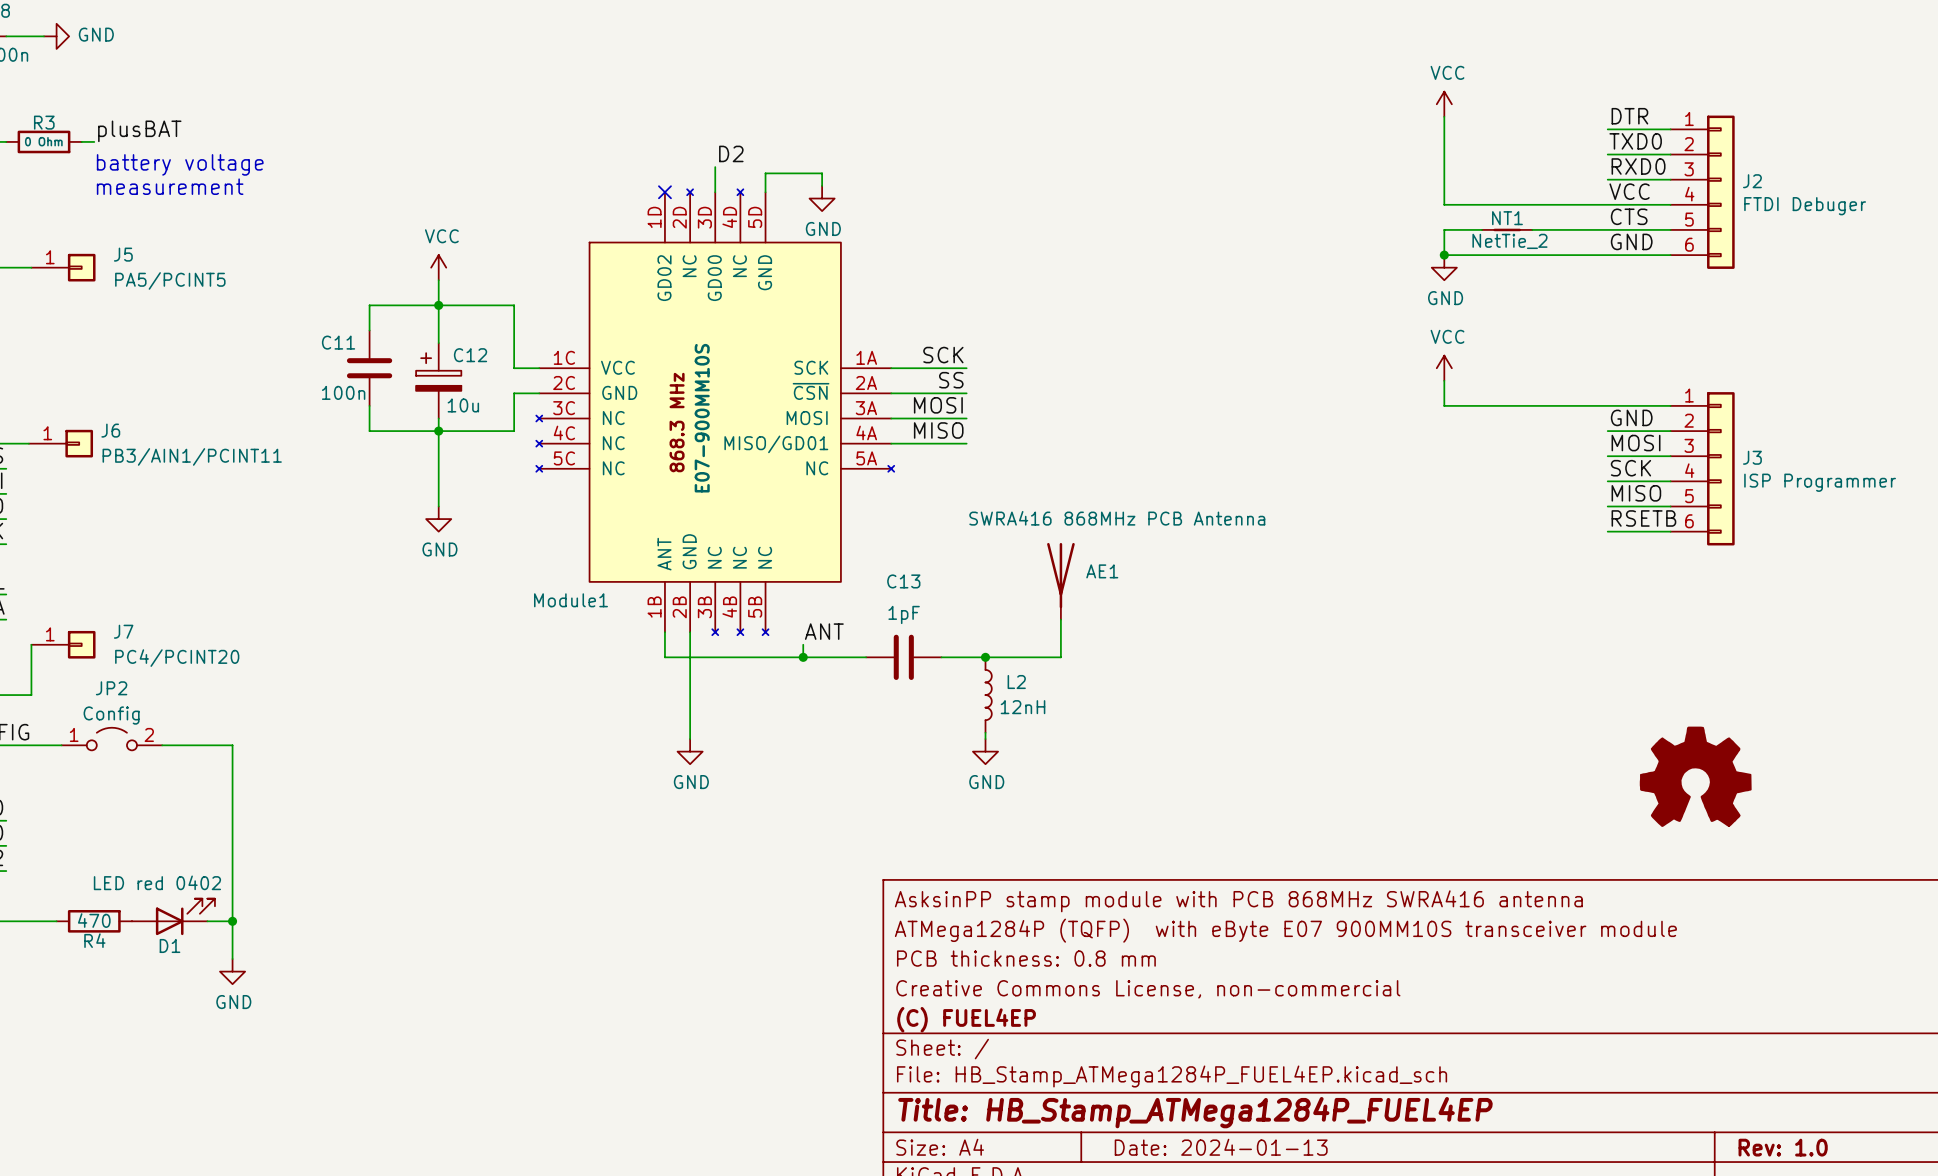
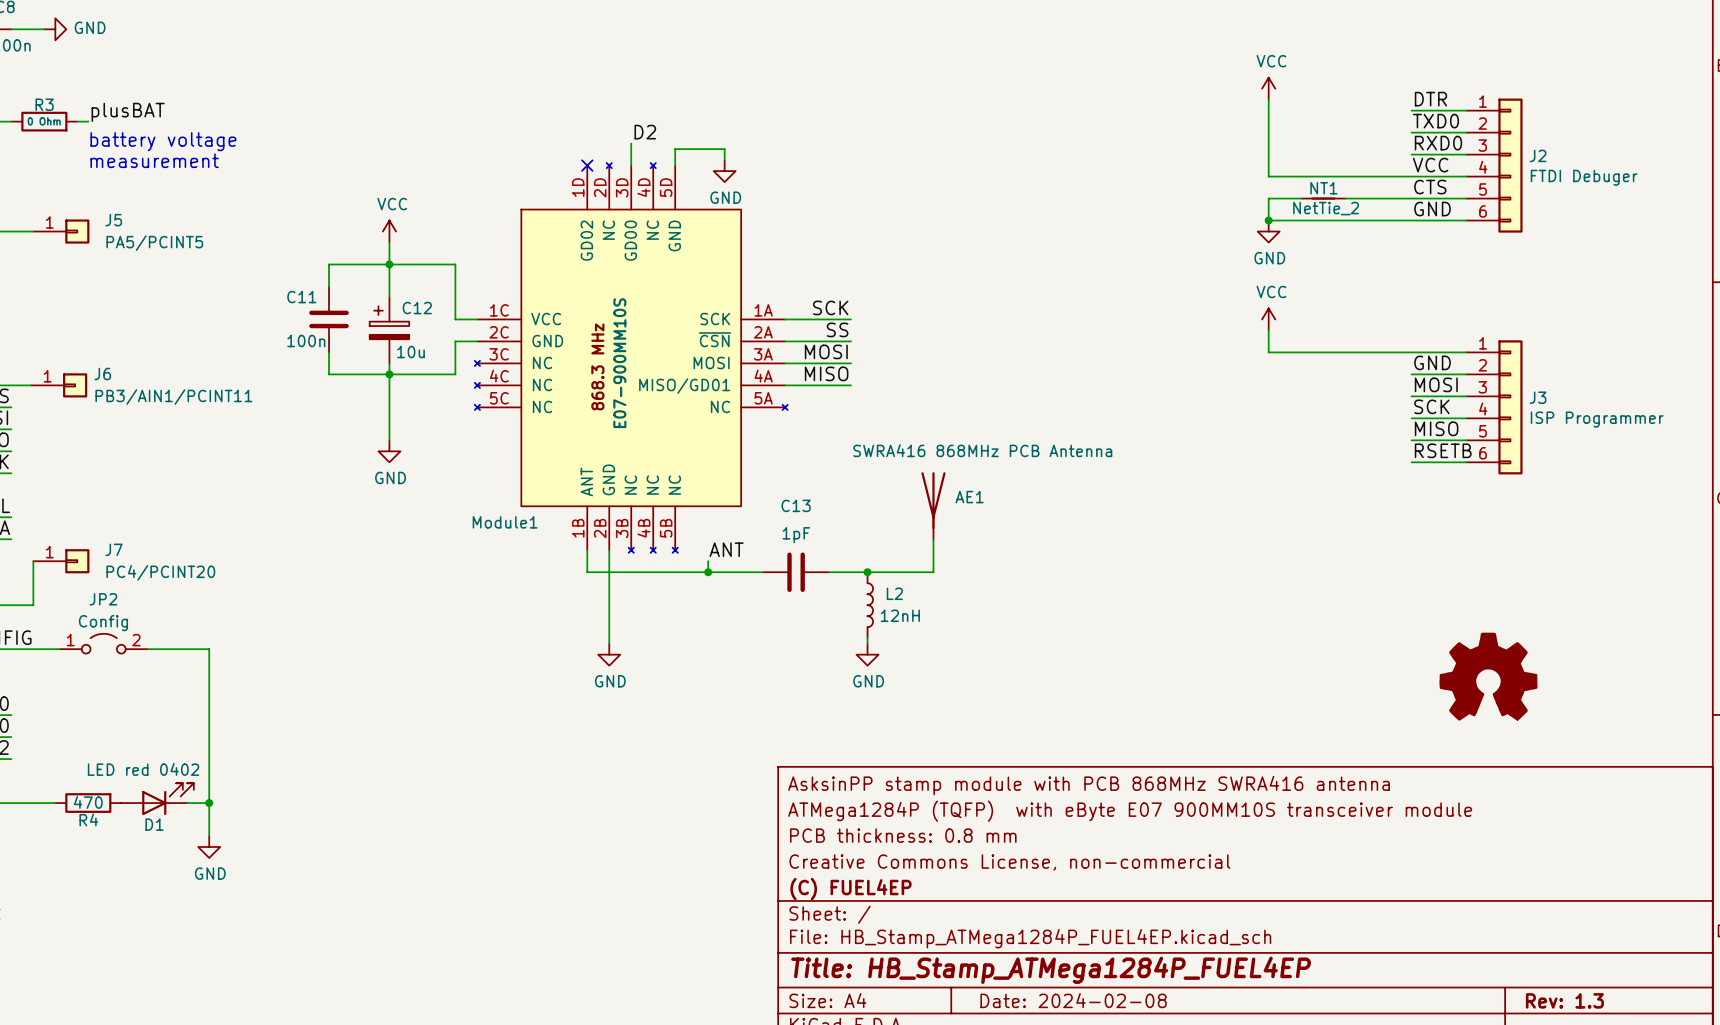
title block: Date: 2024-01-13 (1221, 1147) -> Date: 2024-02-08 (1073, 1000)
title block: Rev: 1.0 (1783, 1147) -> Rev: 1.3 (1564, 1000)

